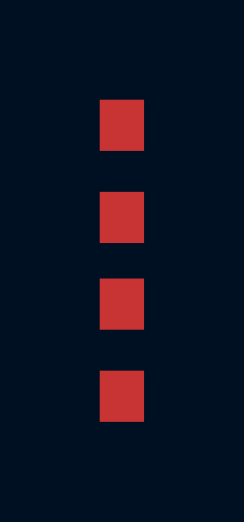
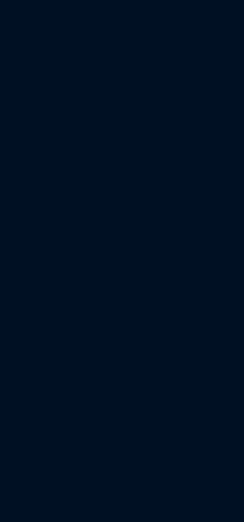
part: (121, 171) -> none
part: (121, 350) -> none

